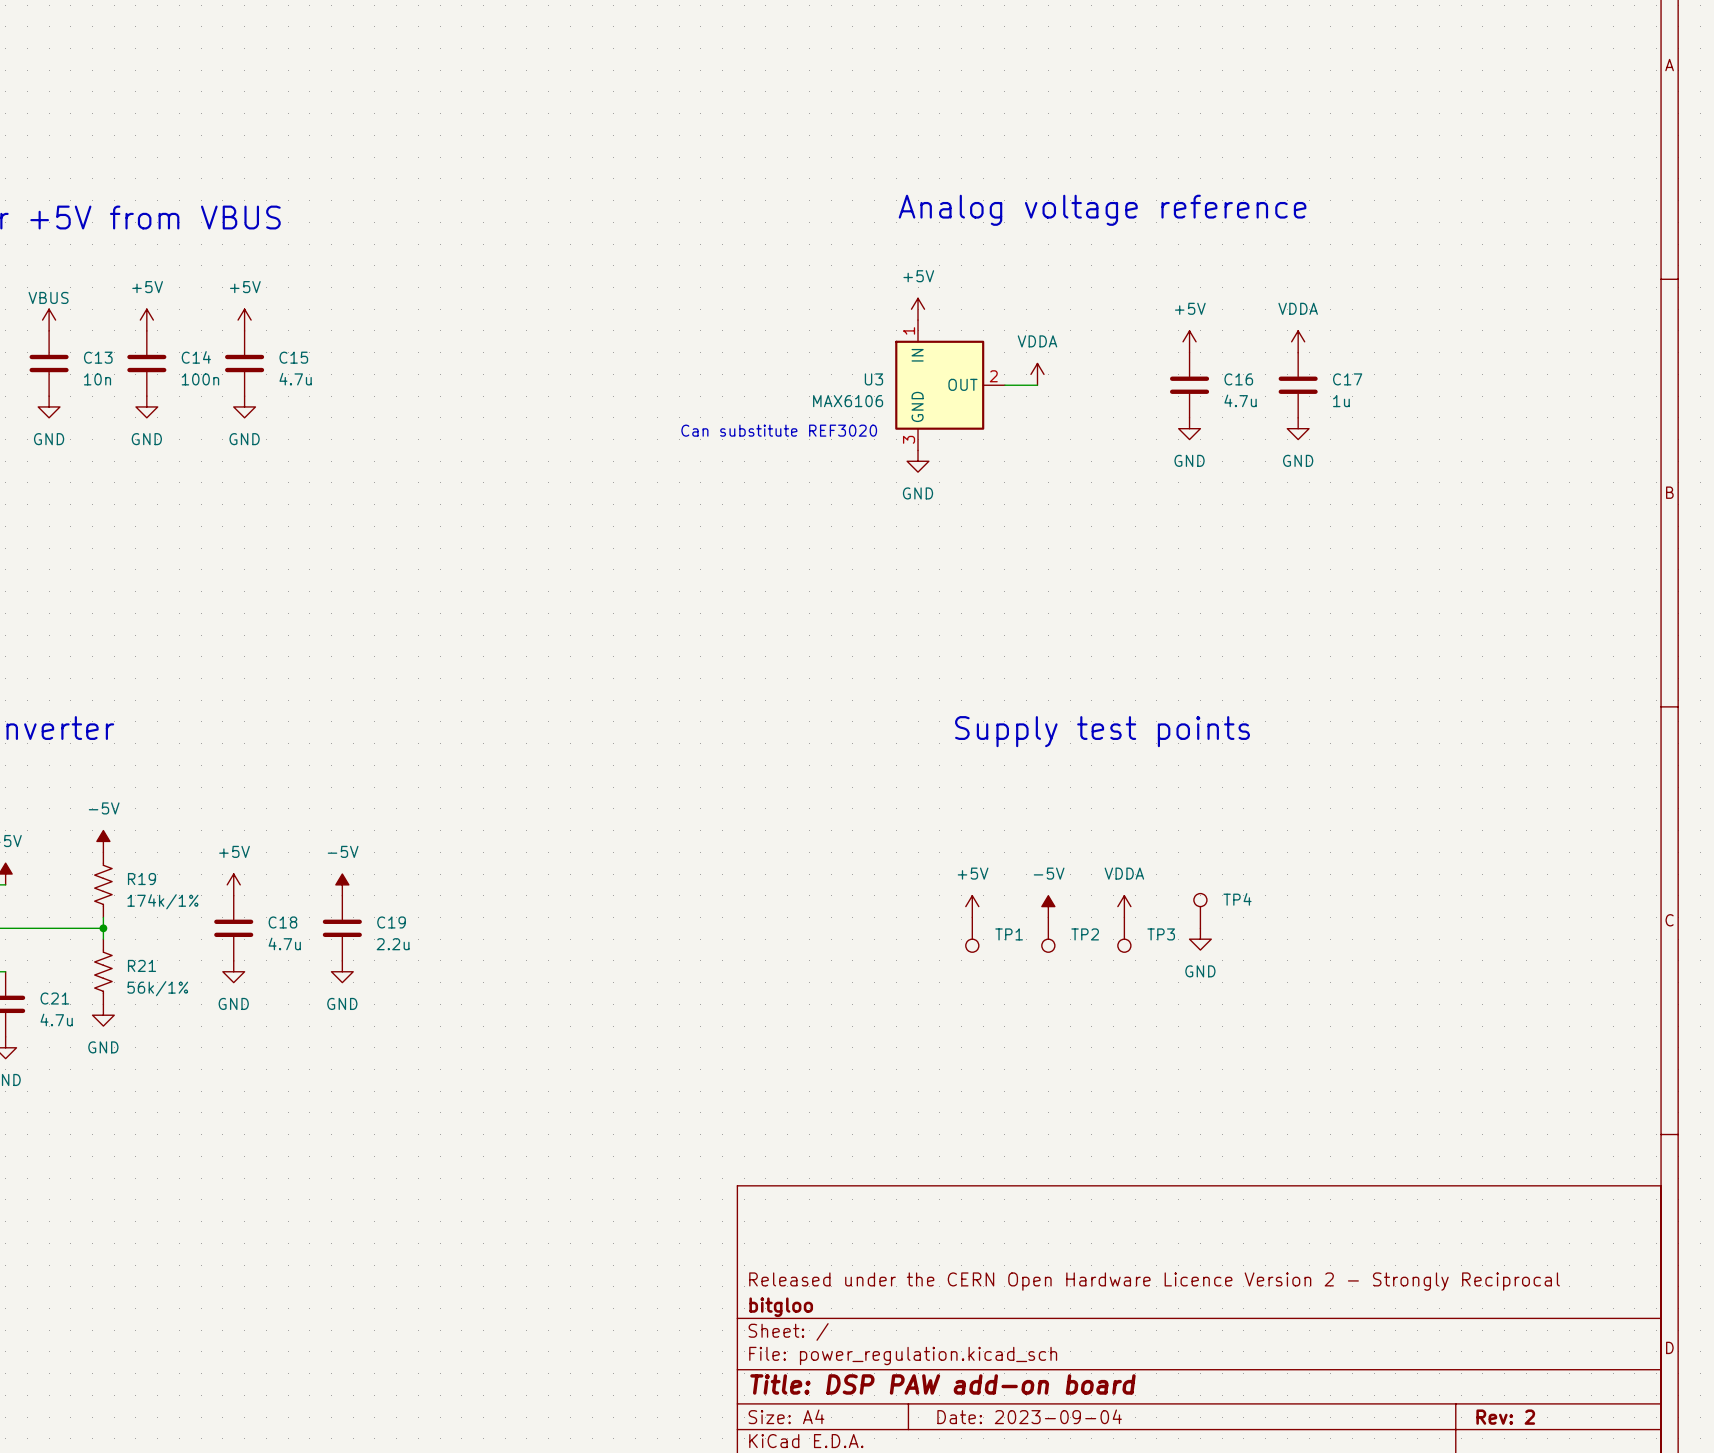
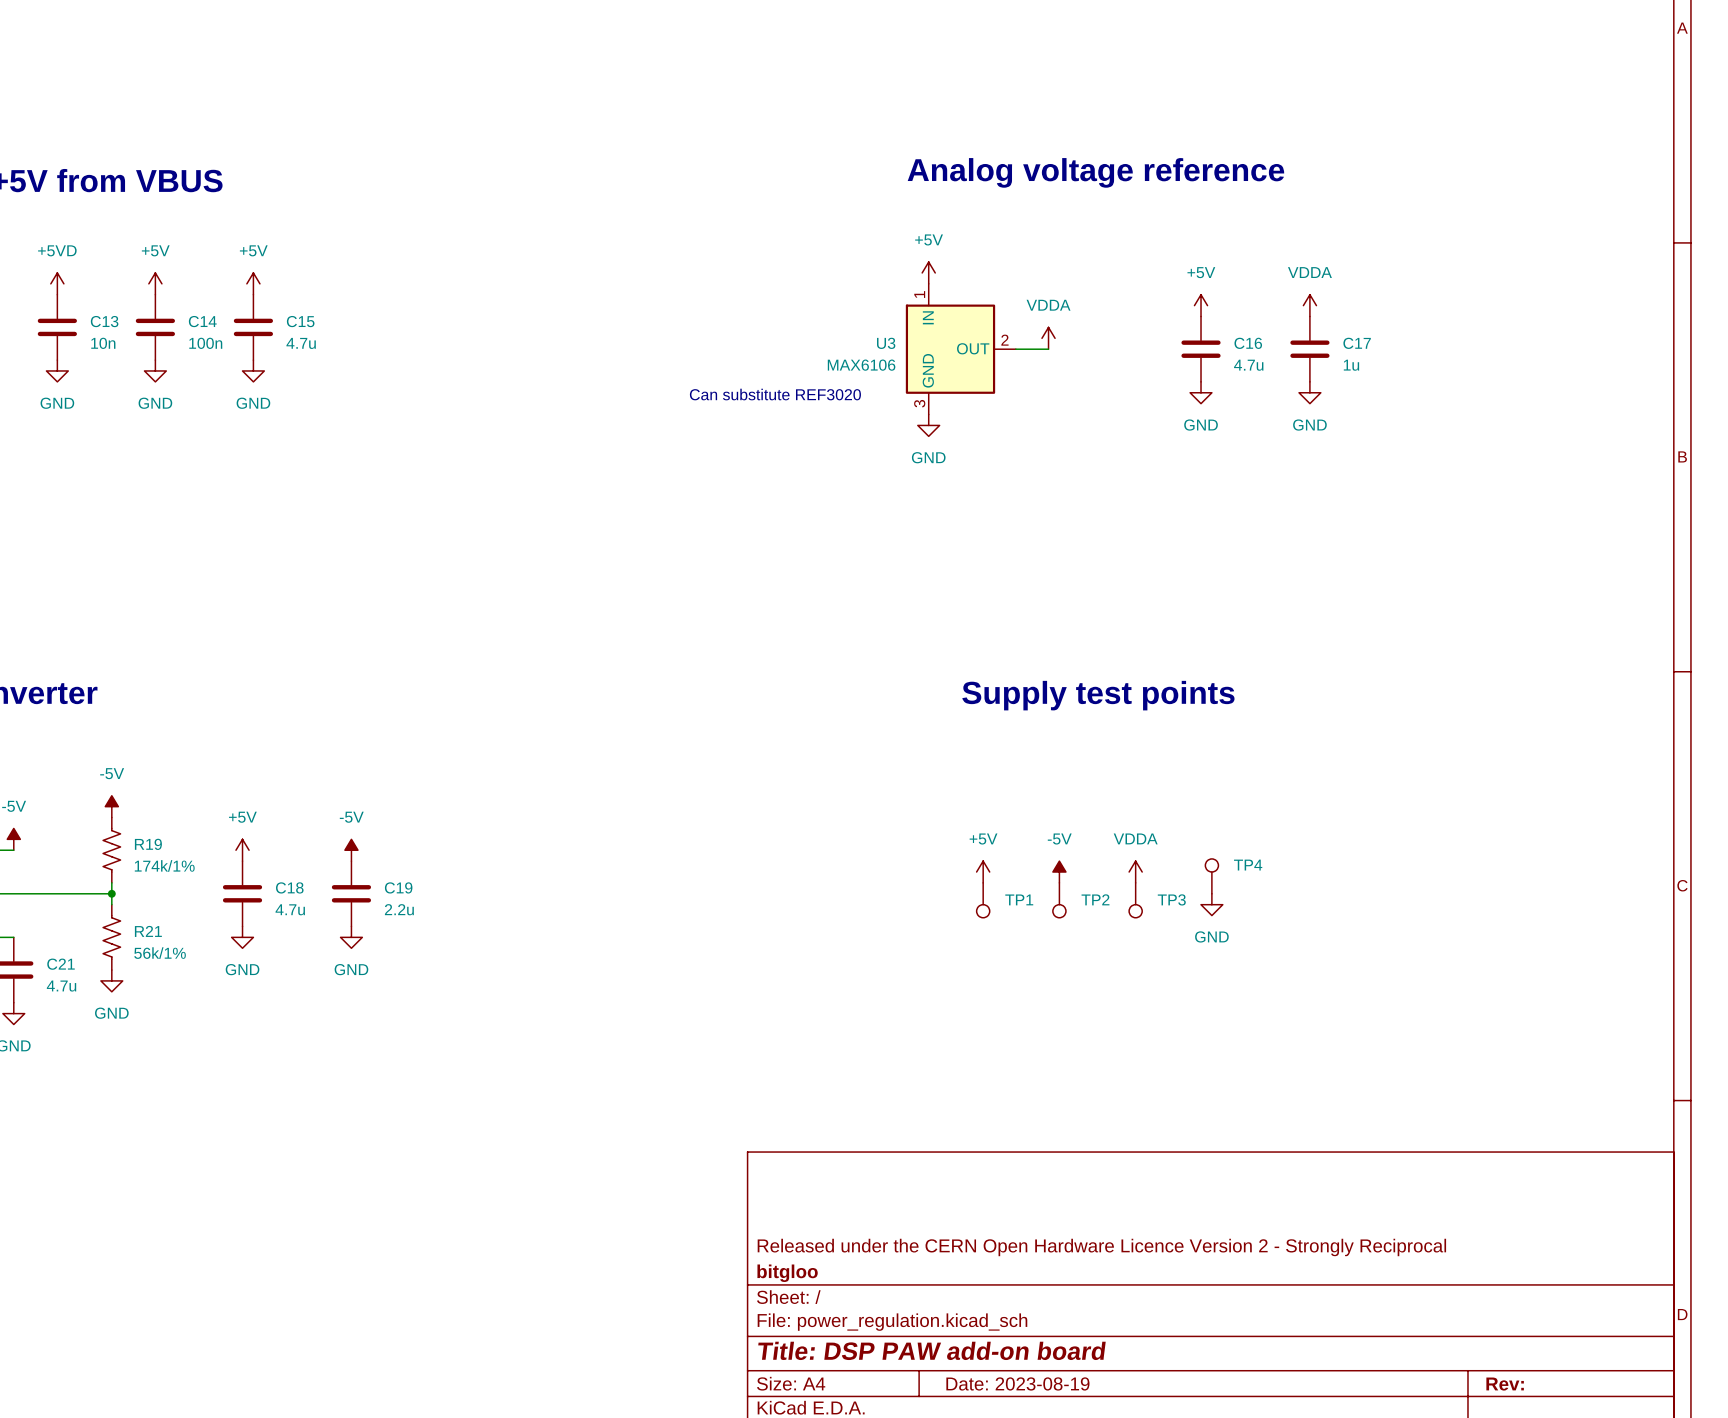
power symbol: VBUS (49, 320) -> +5VD (57, 283)
title block: Date: 2023-09-04 (1029, 1416) -> Date: 2023-08-19 (1017, 1383)
title block: Rev: 2 (1505, 1417) -> Rev: (1505, 1384)

